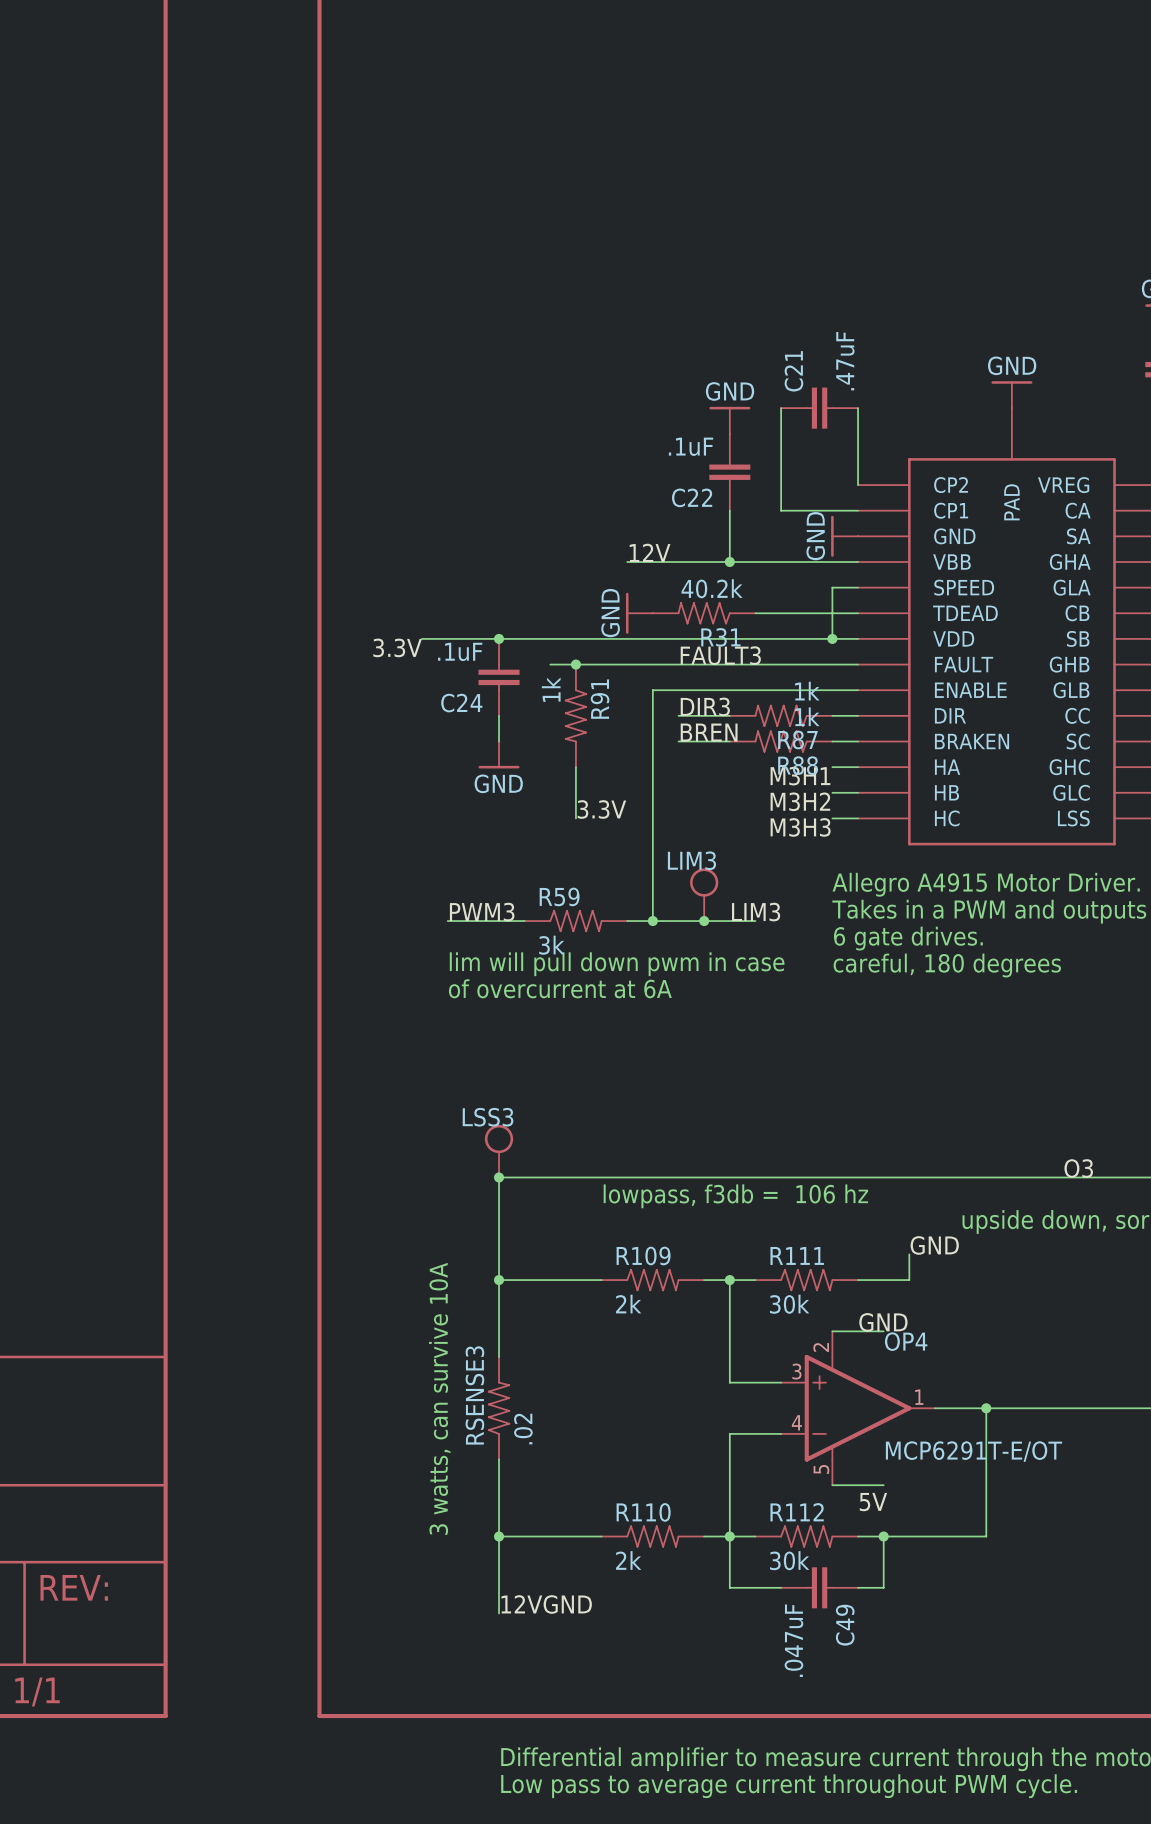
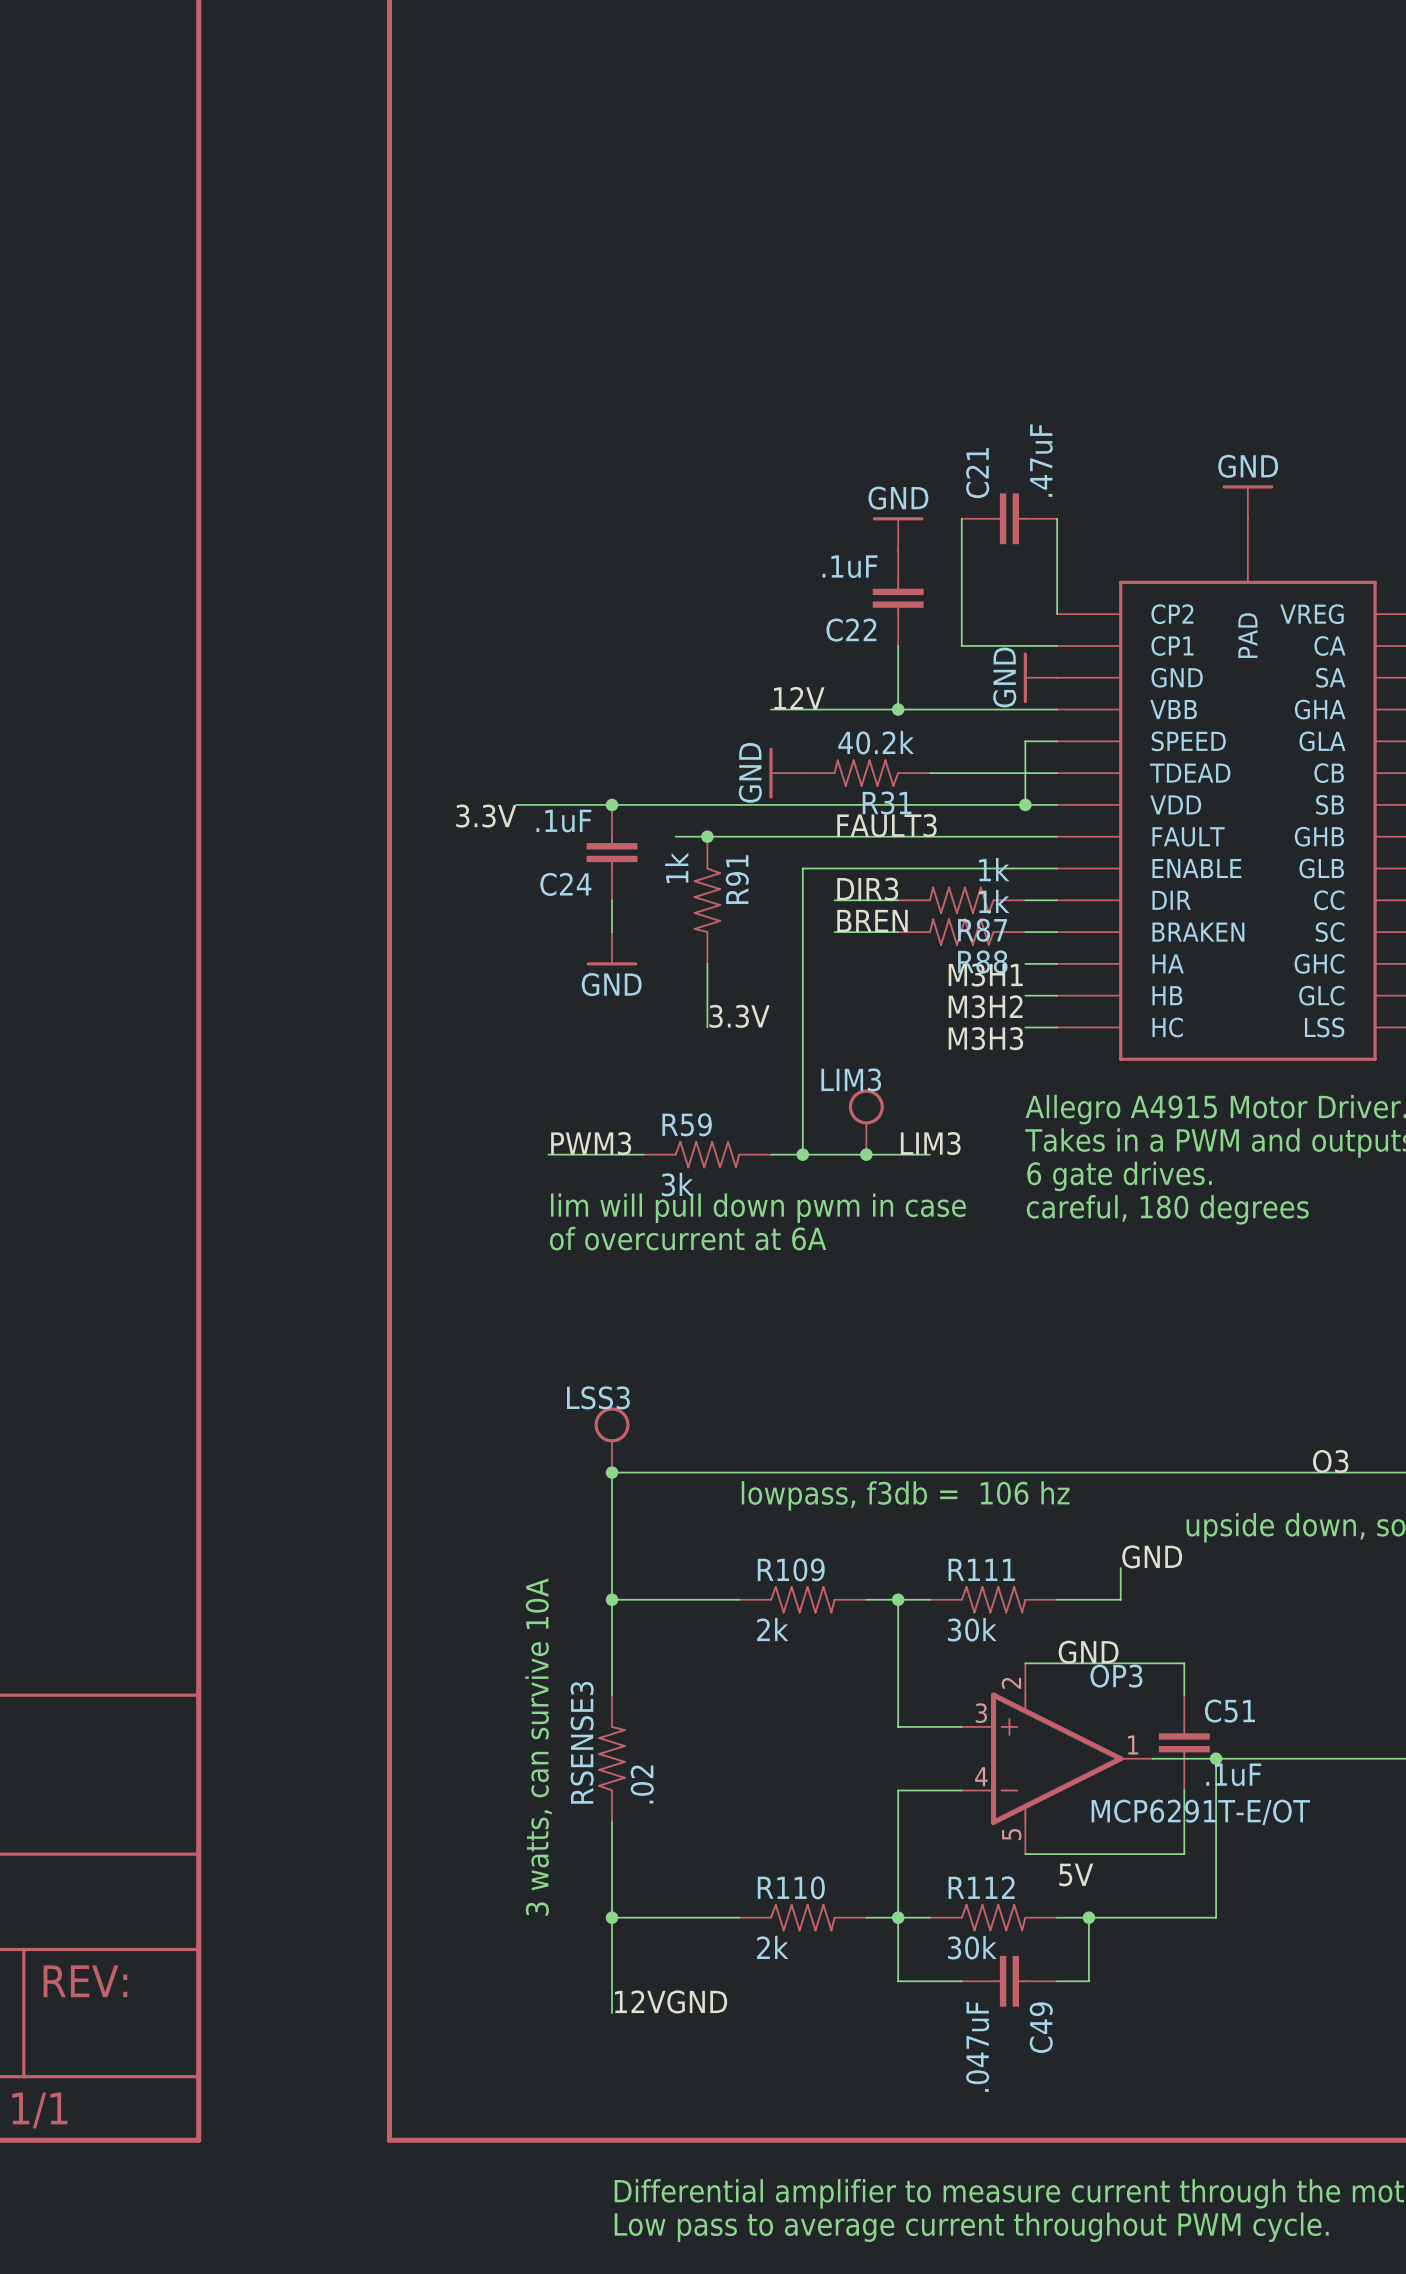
wire: none -> (1088, 1663) (1184, 1663) (1184, 1695)
OP4 name: OP4 (906, 1341) -> OP3 (1116, 1676)
C51: none -> .1uF (1184, 1742)
wire: none -> (1184, 1790) (1184, 1854) (1088, 1854)

